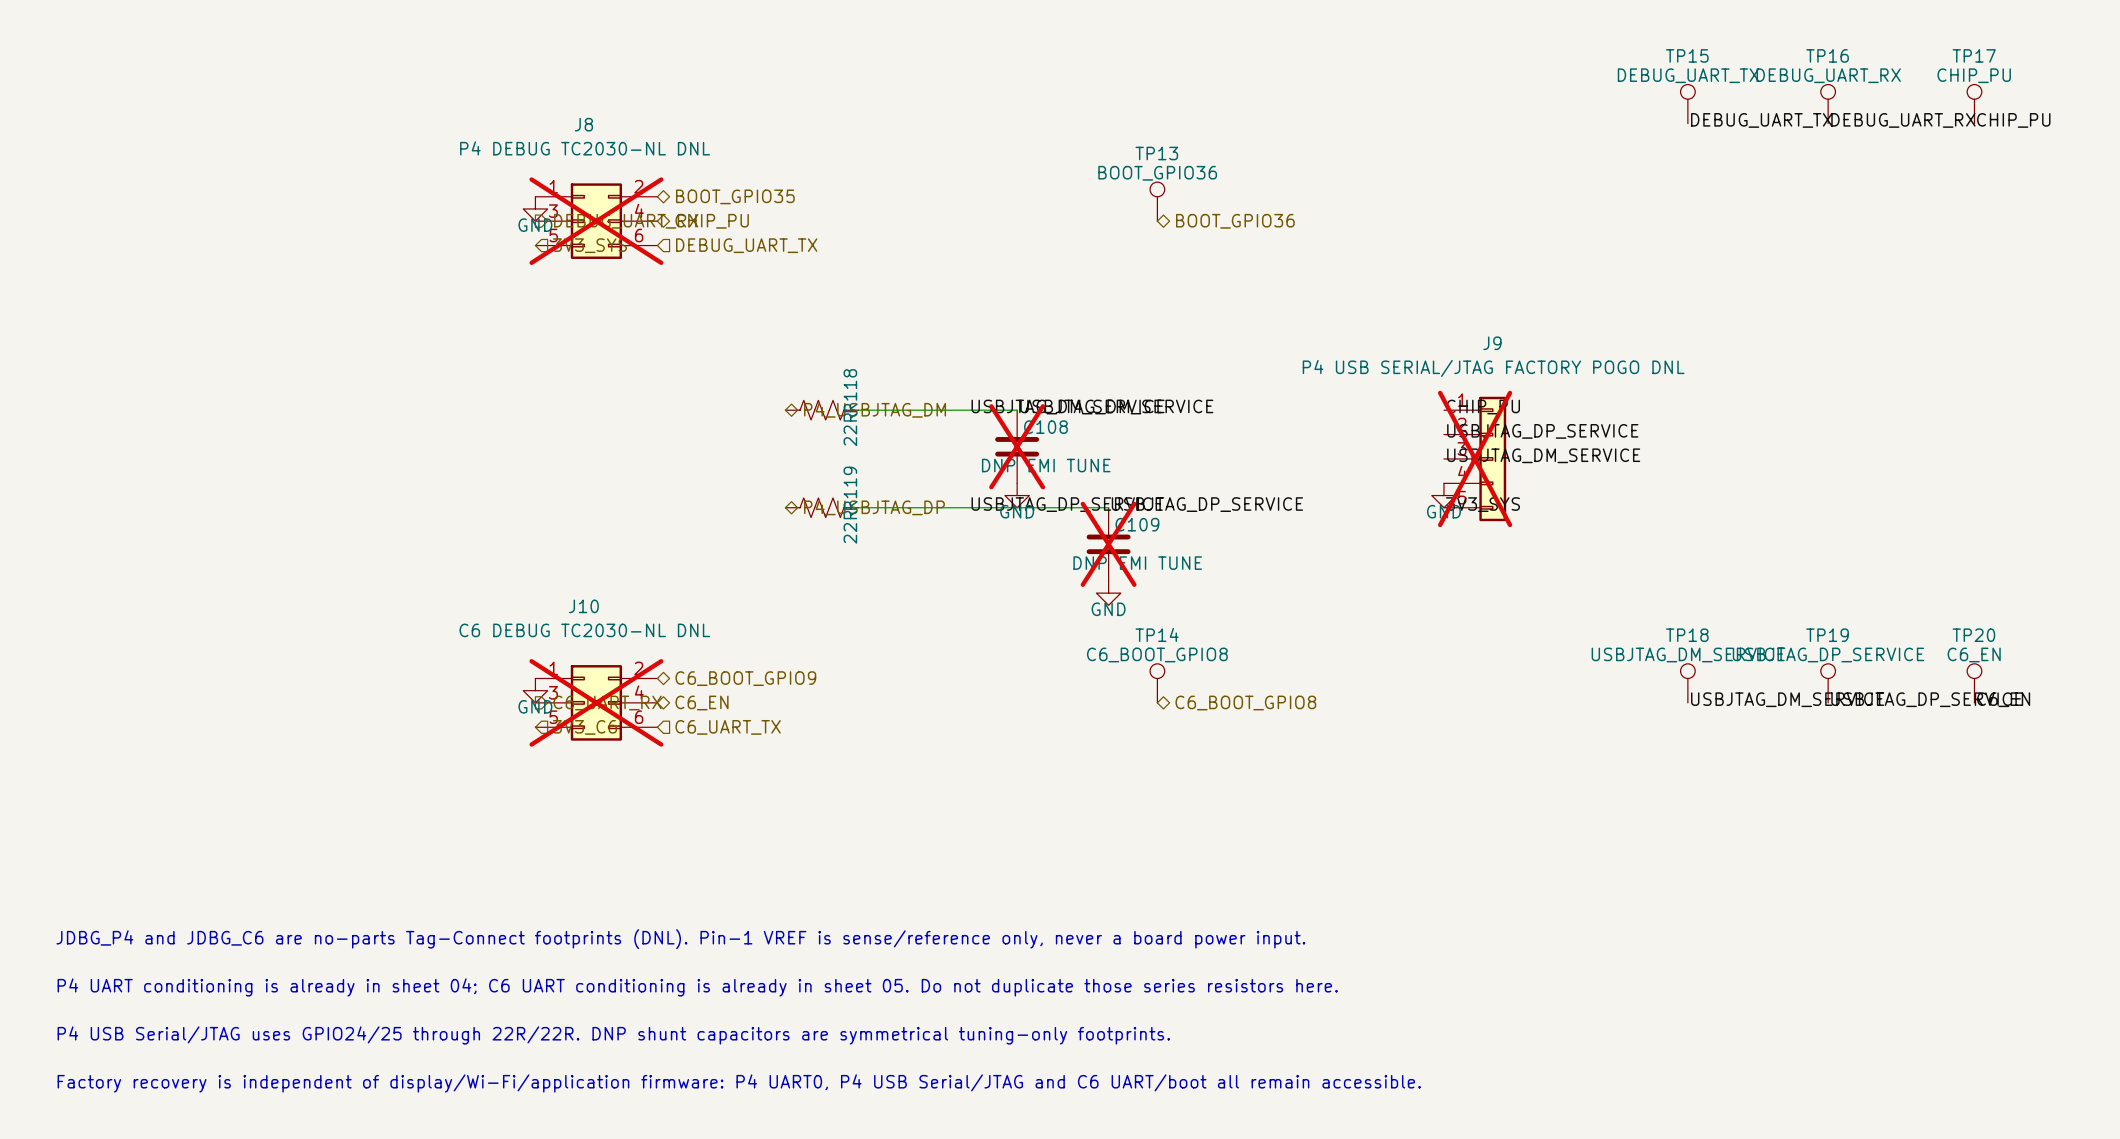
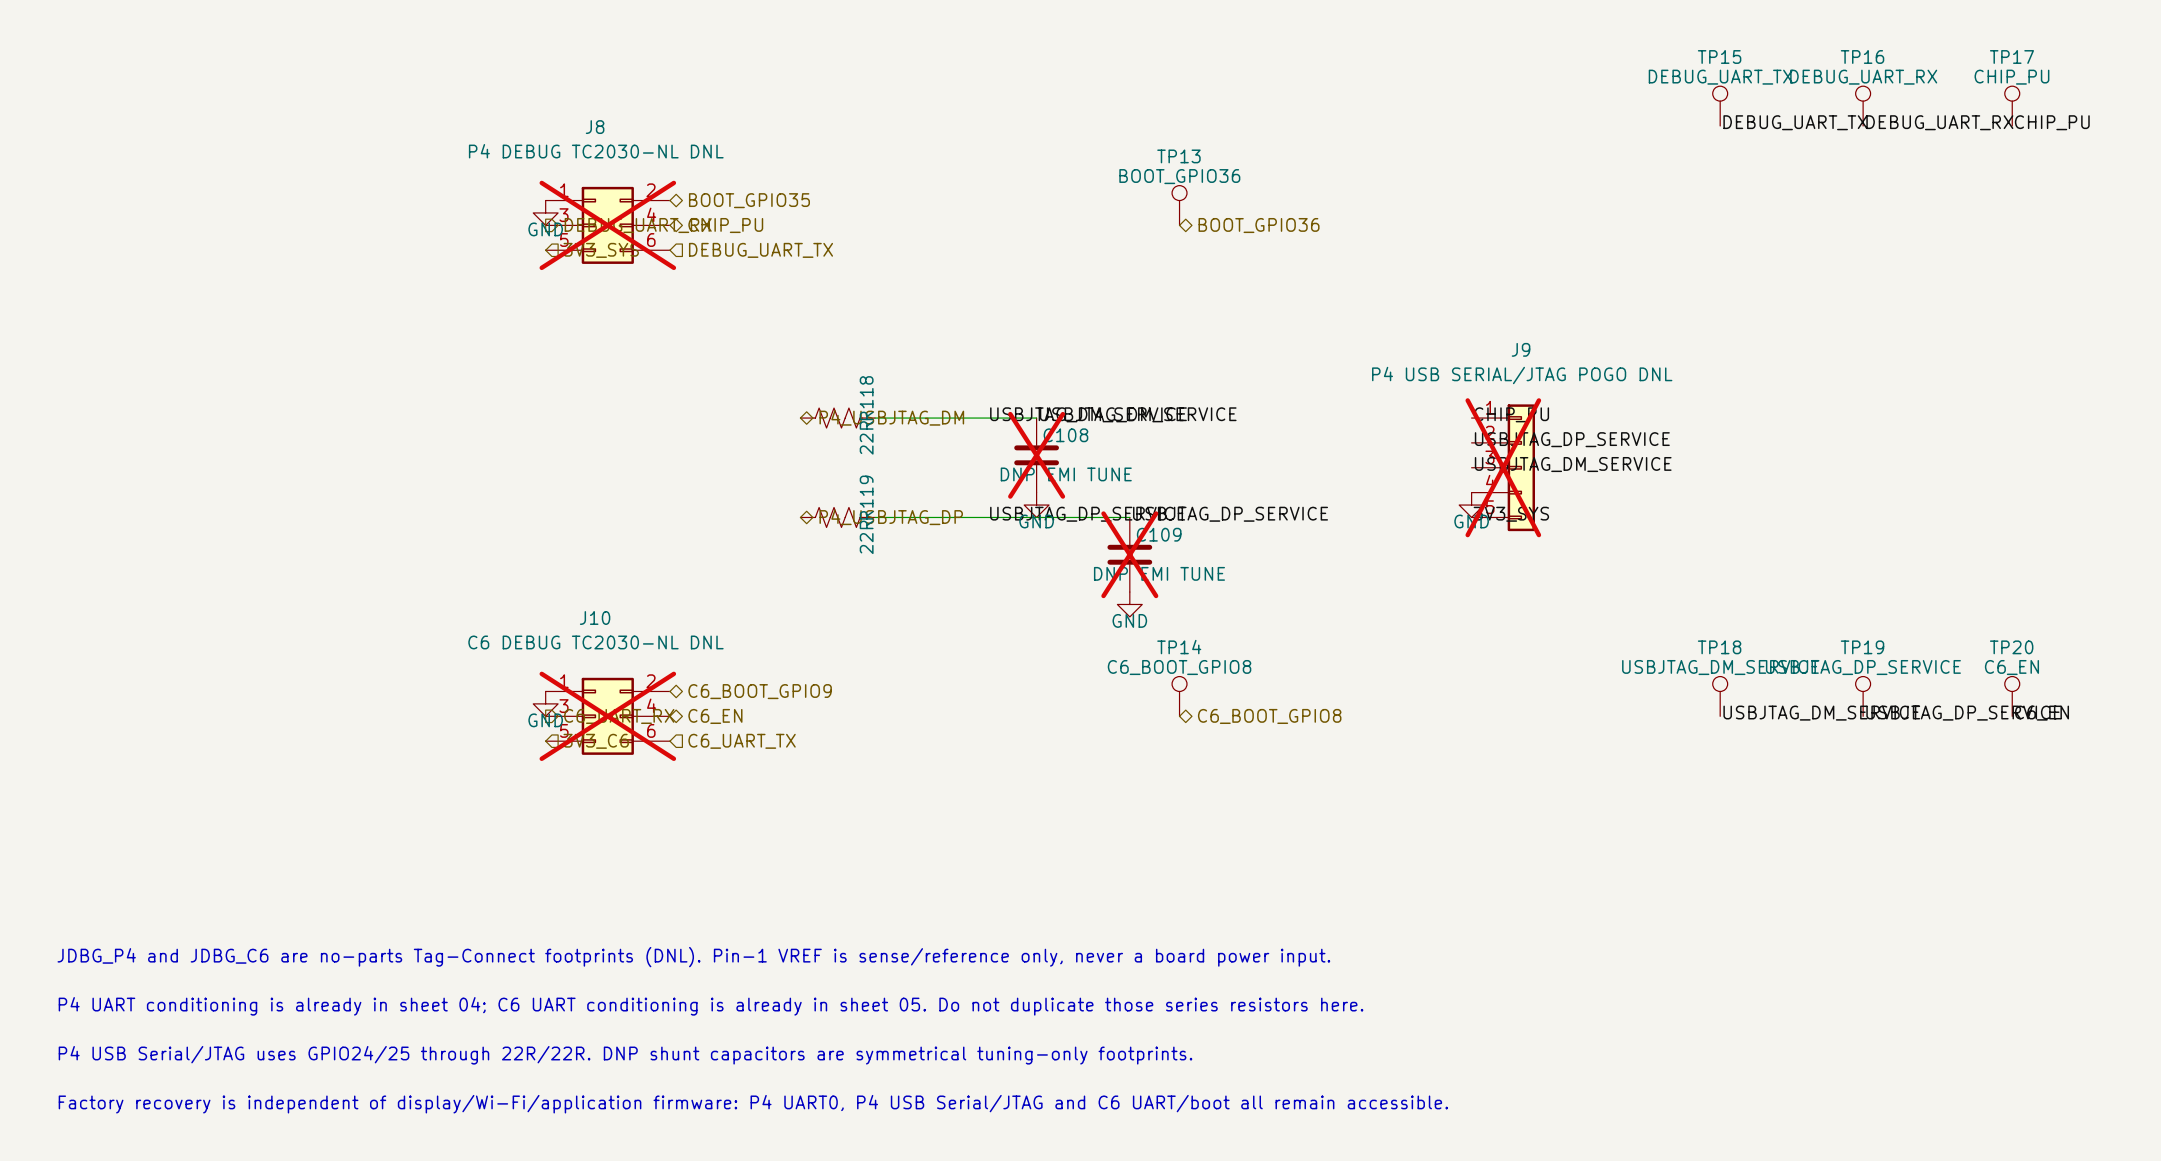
J9 value: P4 USB SERIAL/JTAG FACTORY POGO DNL (1493, 368) -> P4 USB SERIAL/JTAG POGO DNL (1522, 375)

